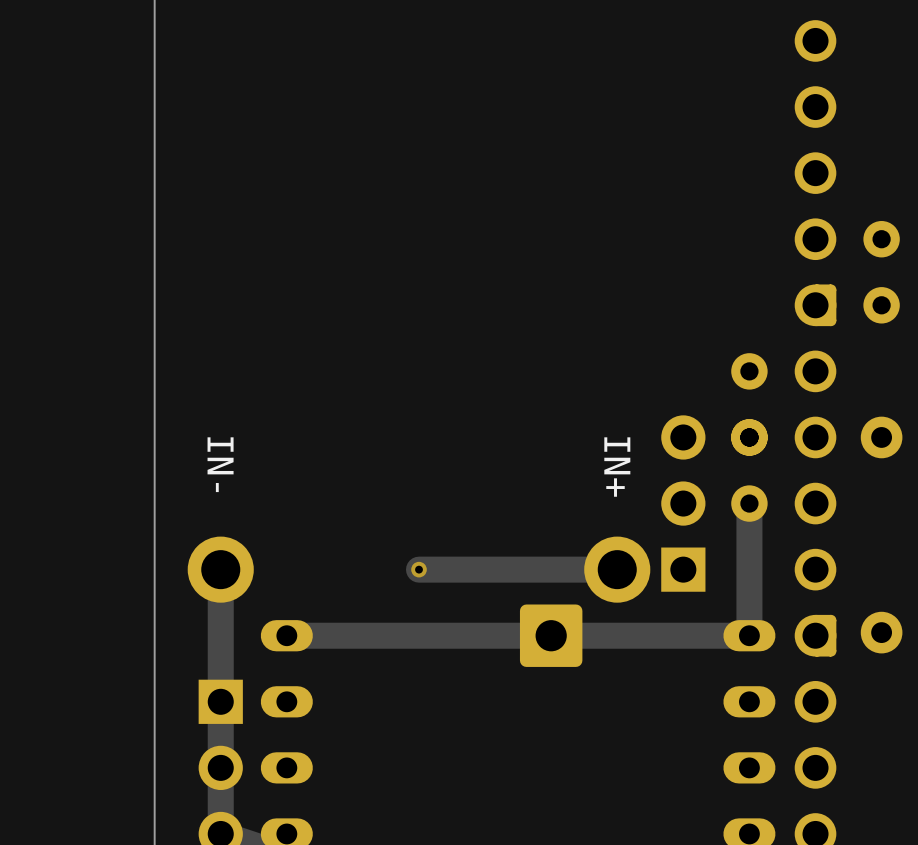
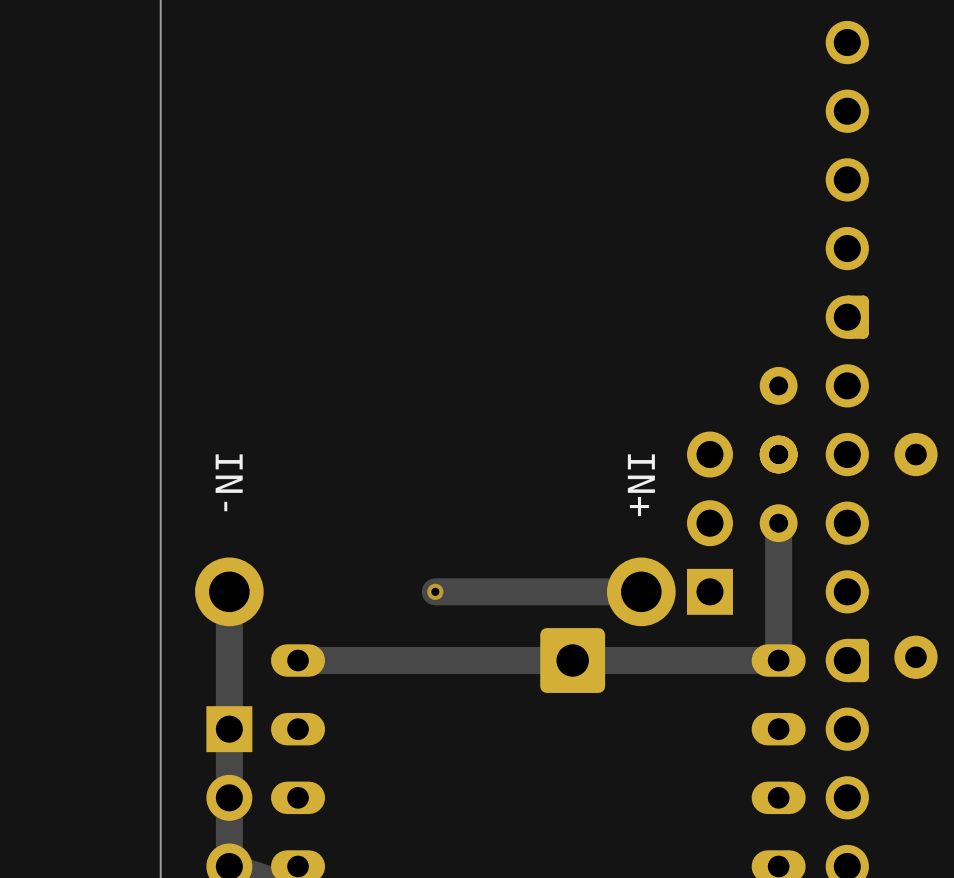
part: (881, 272) -> none

